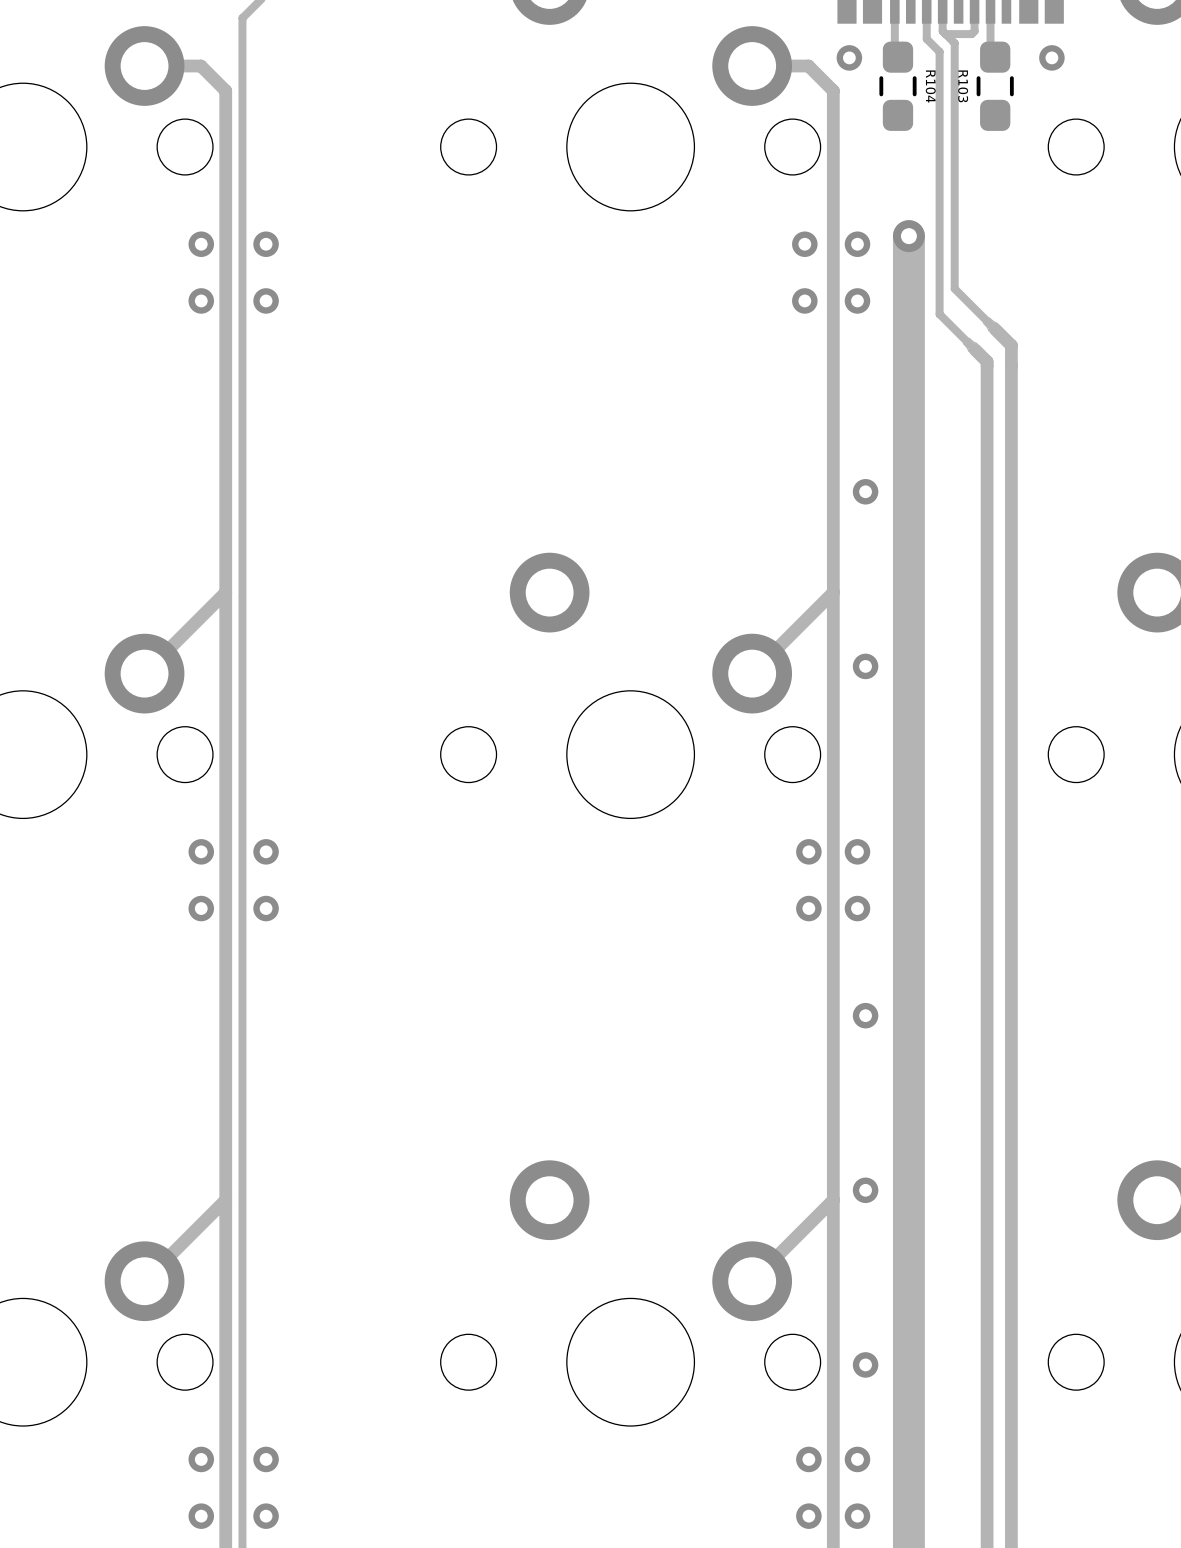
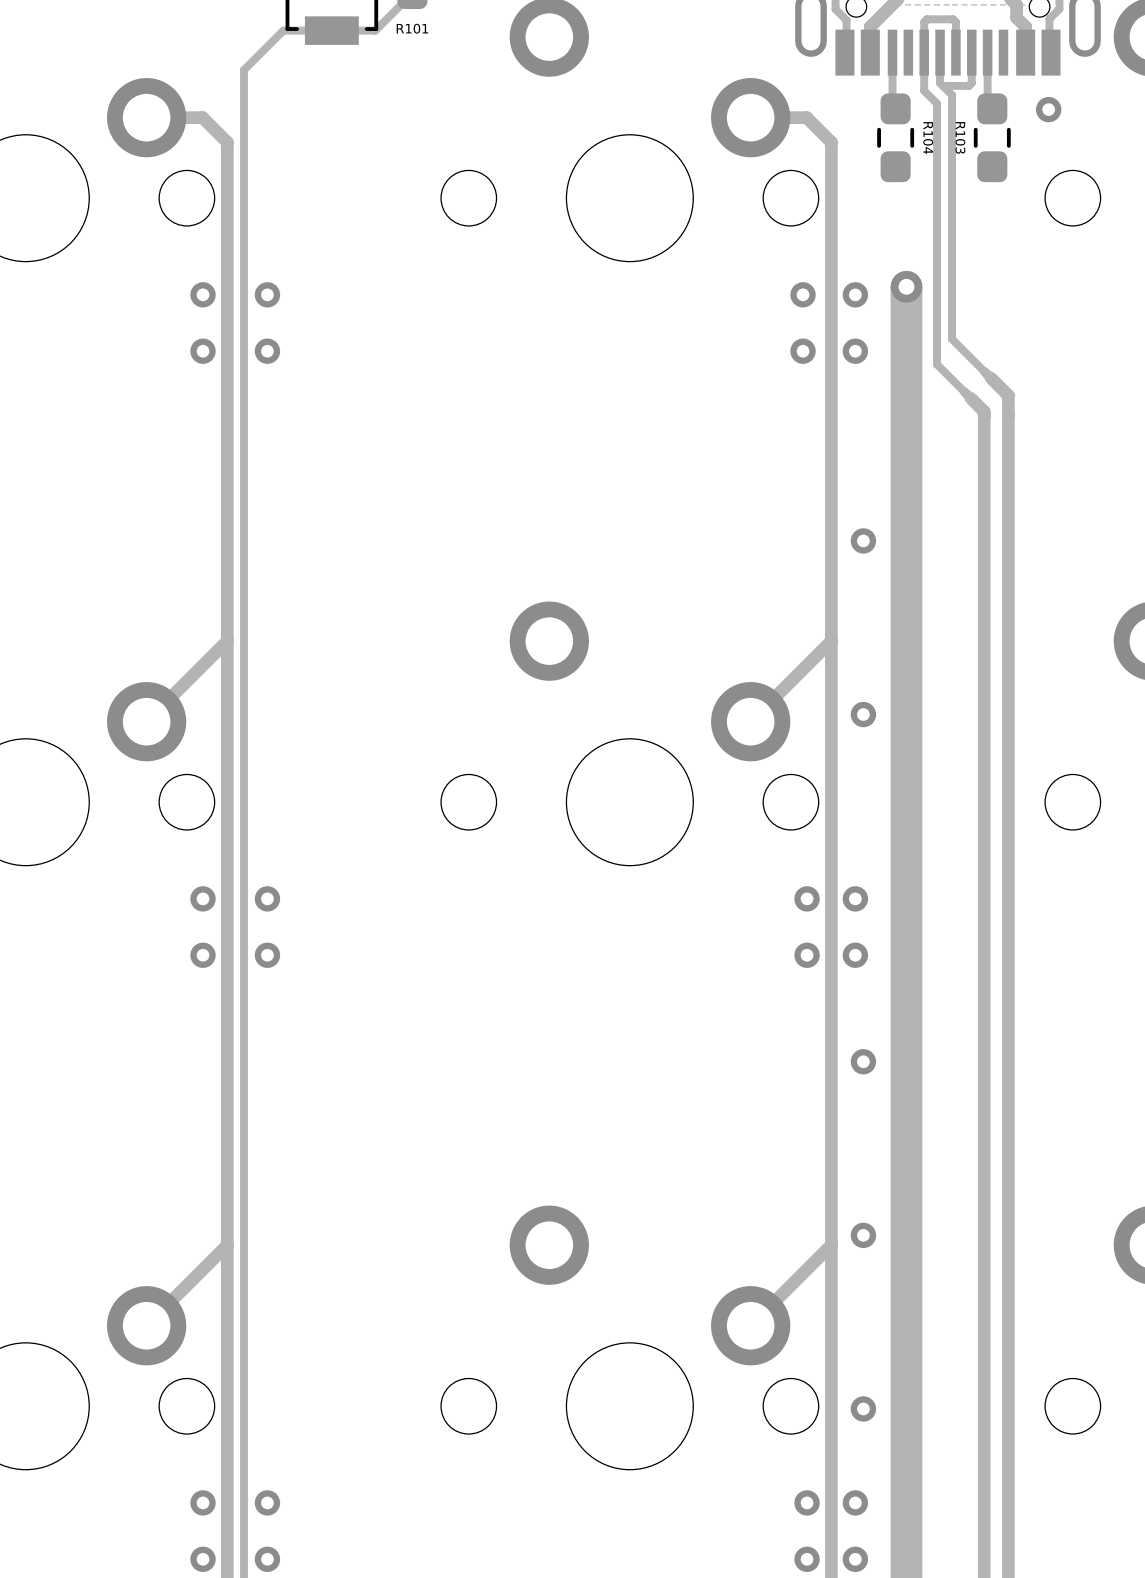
via: (849, 57) -> none

